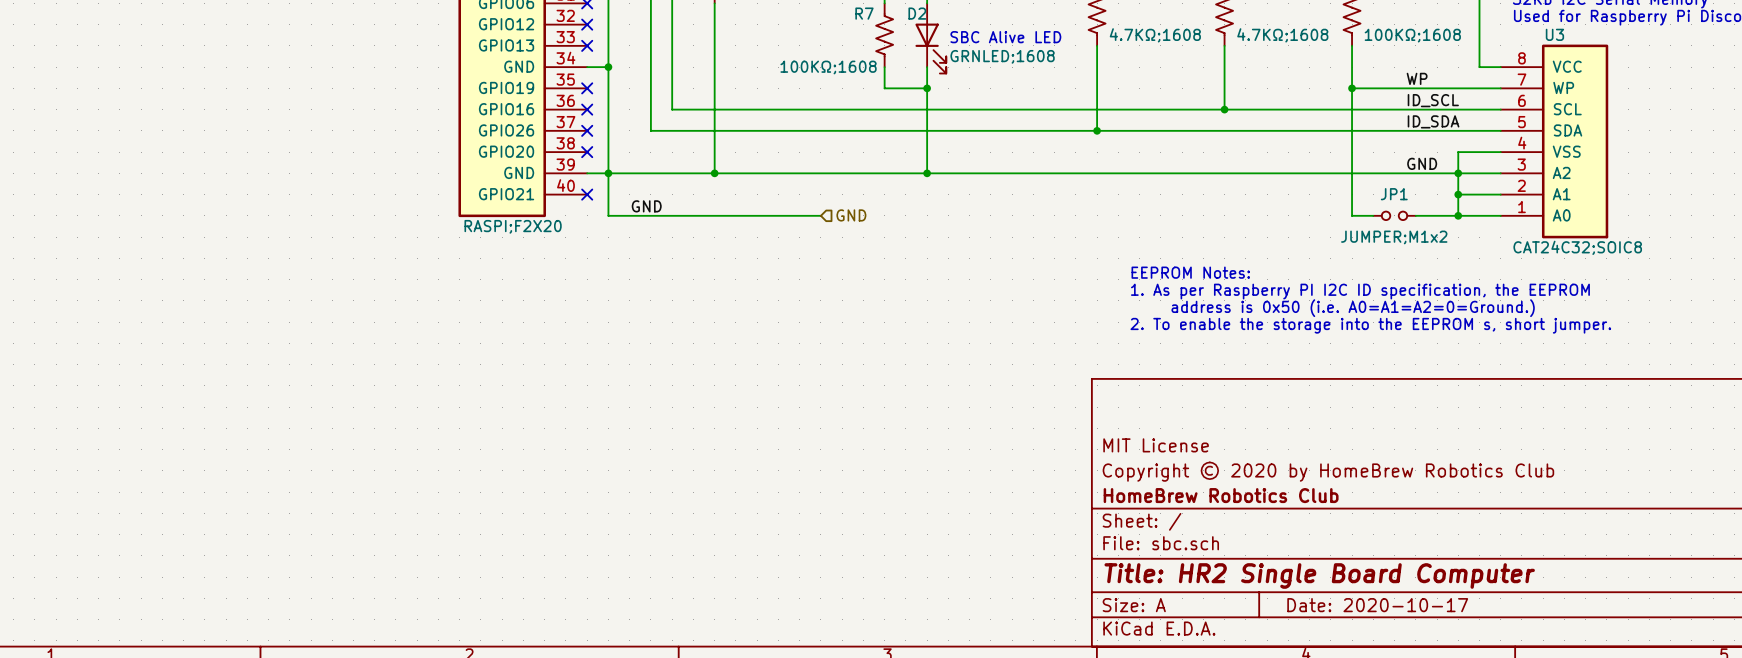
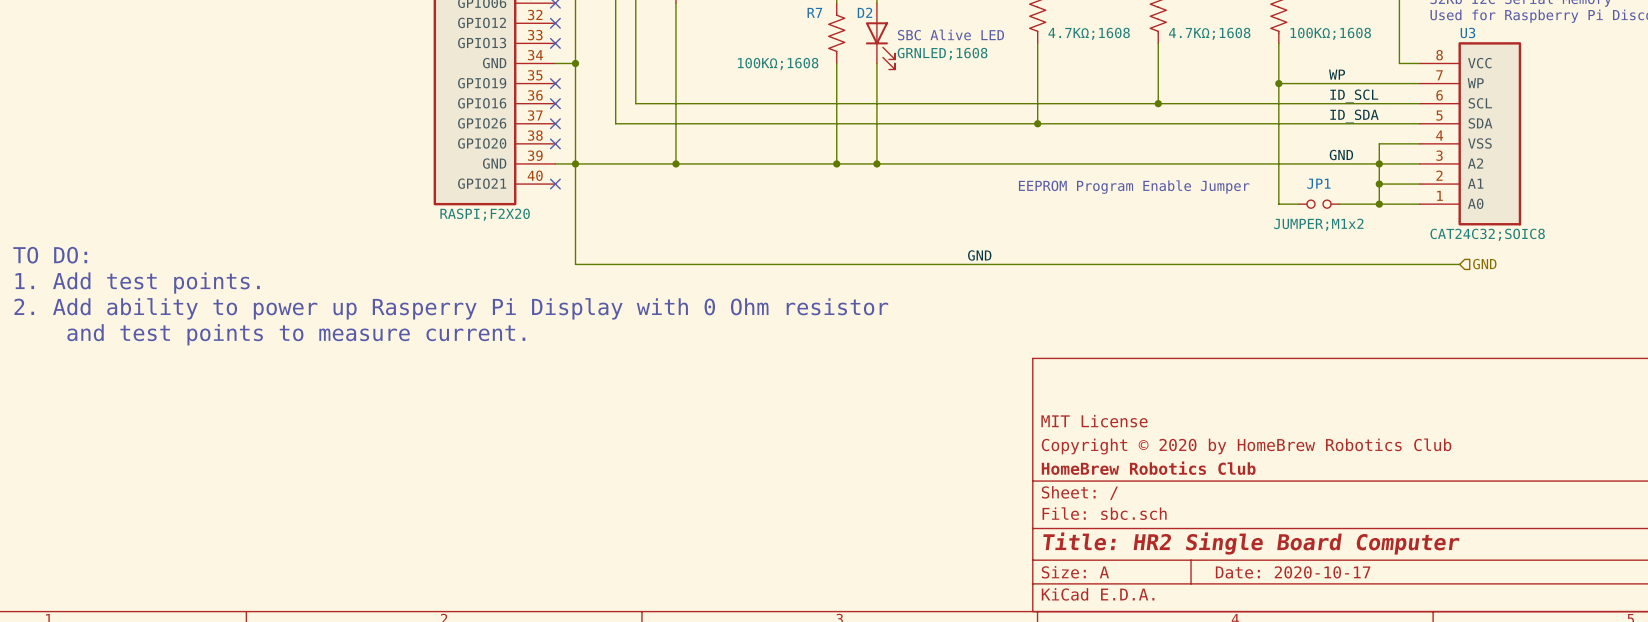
wire: (884, 88) (927, 88) -> (836, 83) (836, 163)
junction: (927, 88) -> none
junction: none -> (836, 163)
text: none -> EEPROM Program Enable Jumper (1134, 187)
label: GND (646, 206) -> none
wire: (608, 215) (820, 215) -> (575, 204) (575, 264) (1459, 264)
hierarchical label: GND (851, 215) -> none
text: none -> TO DO: (50, 255)
label: none -> GND (979, 255)
text: EEPROM Notes: (1190, 272) -> none
hierarchical label: none -> GND (1484, 264)
text: 1. As per Raspberry PI I2C ID specification, the EEPROM (1360, 291) -> none
text: none -> 1. Add test points. (137, 283)
text: address is 0x50 (i.e. A0=A1=A2=0=Ground.) (1353, 308) -> none
text: 2. To enable the storage into the EEPROM s, short jumper. (1370, 325) -> none
text: none -> 2. Add ability to power up Rasperry Pi Display with 0 Ohm resistor (451, 308)
text: none -> and test points to measure current. (296, 334)

